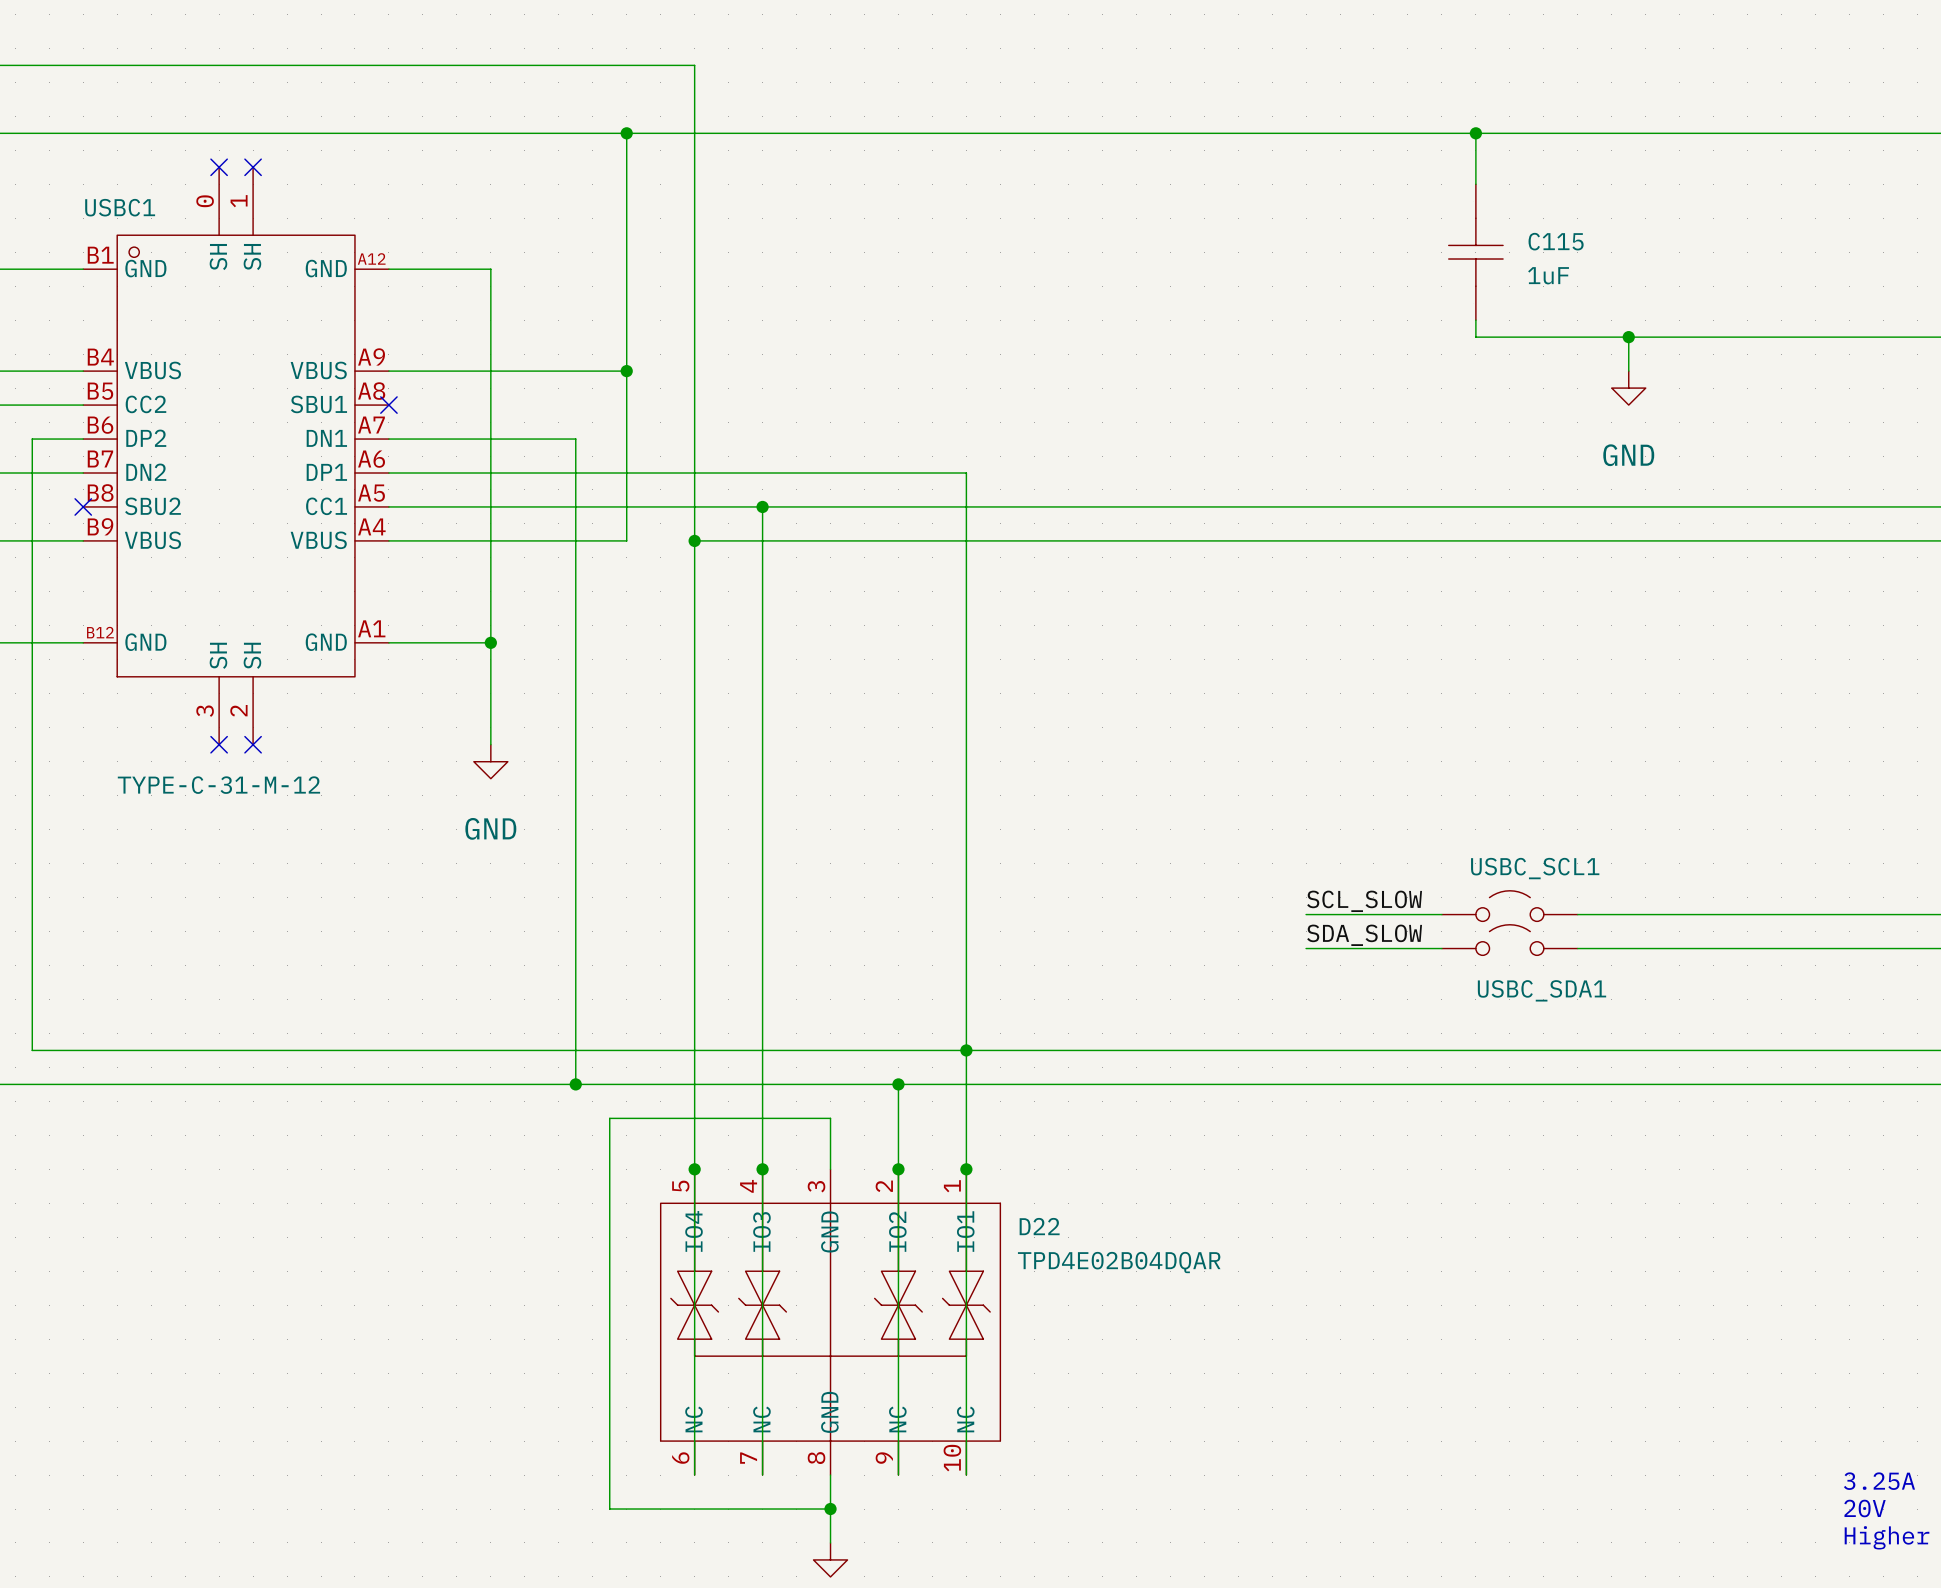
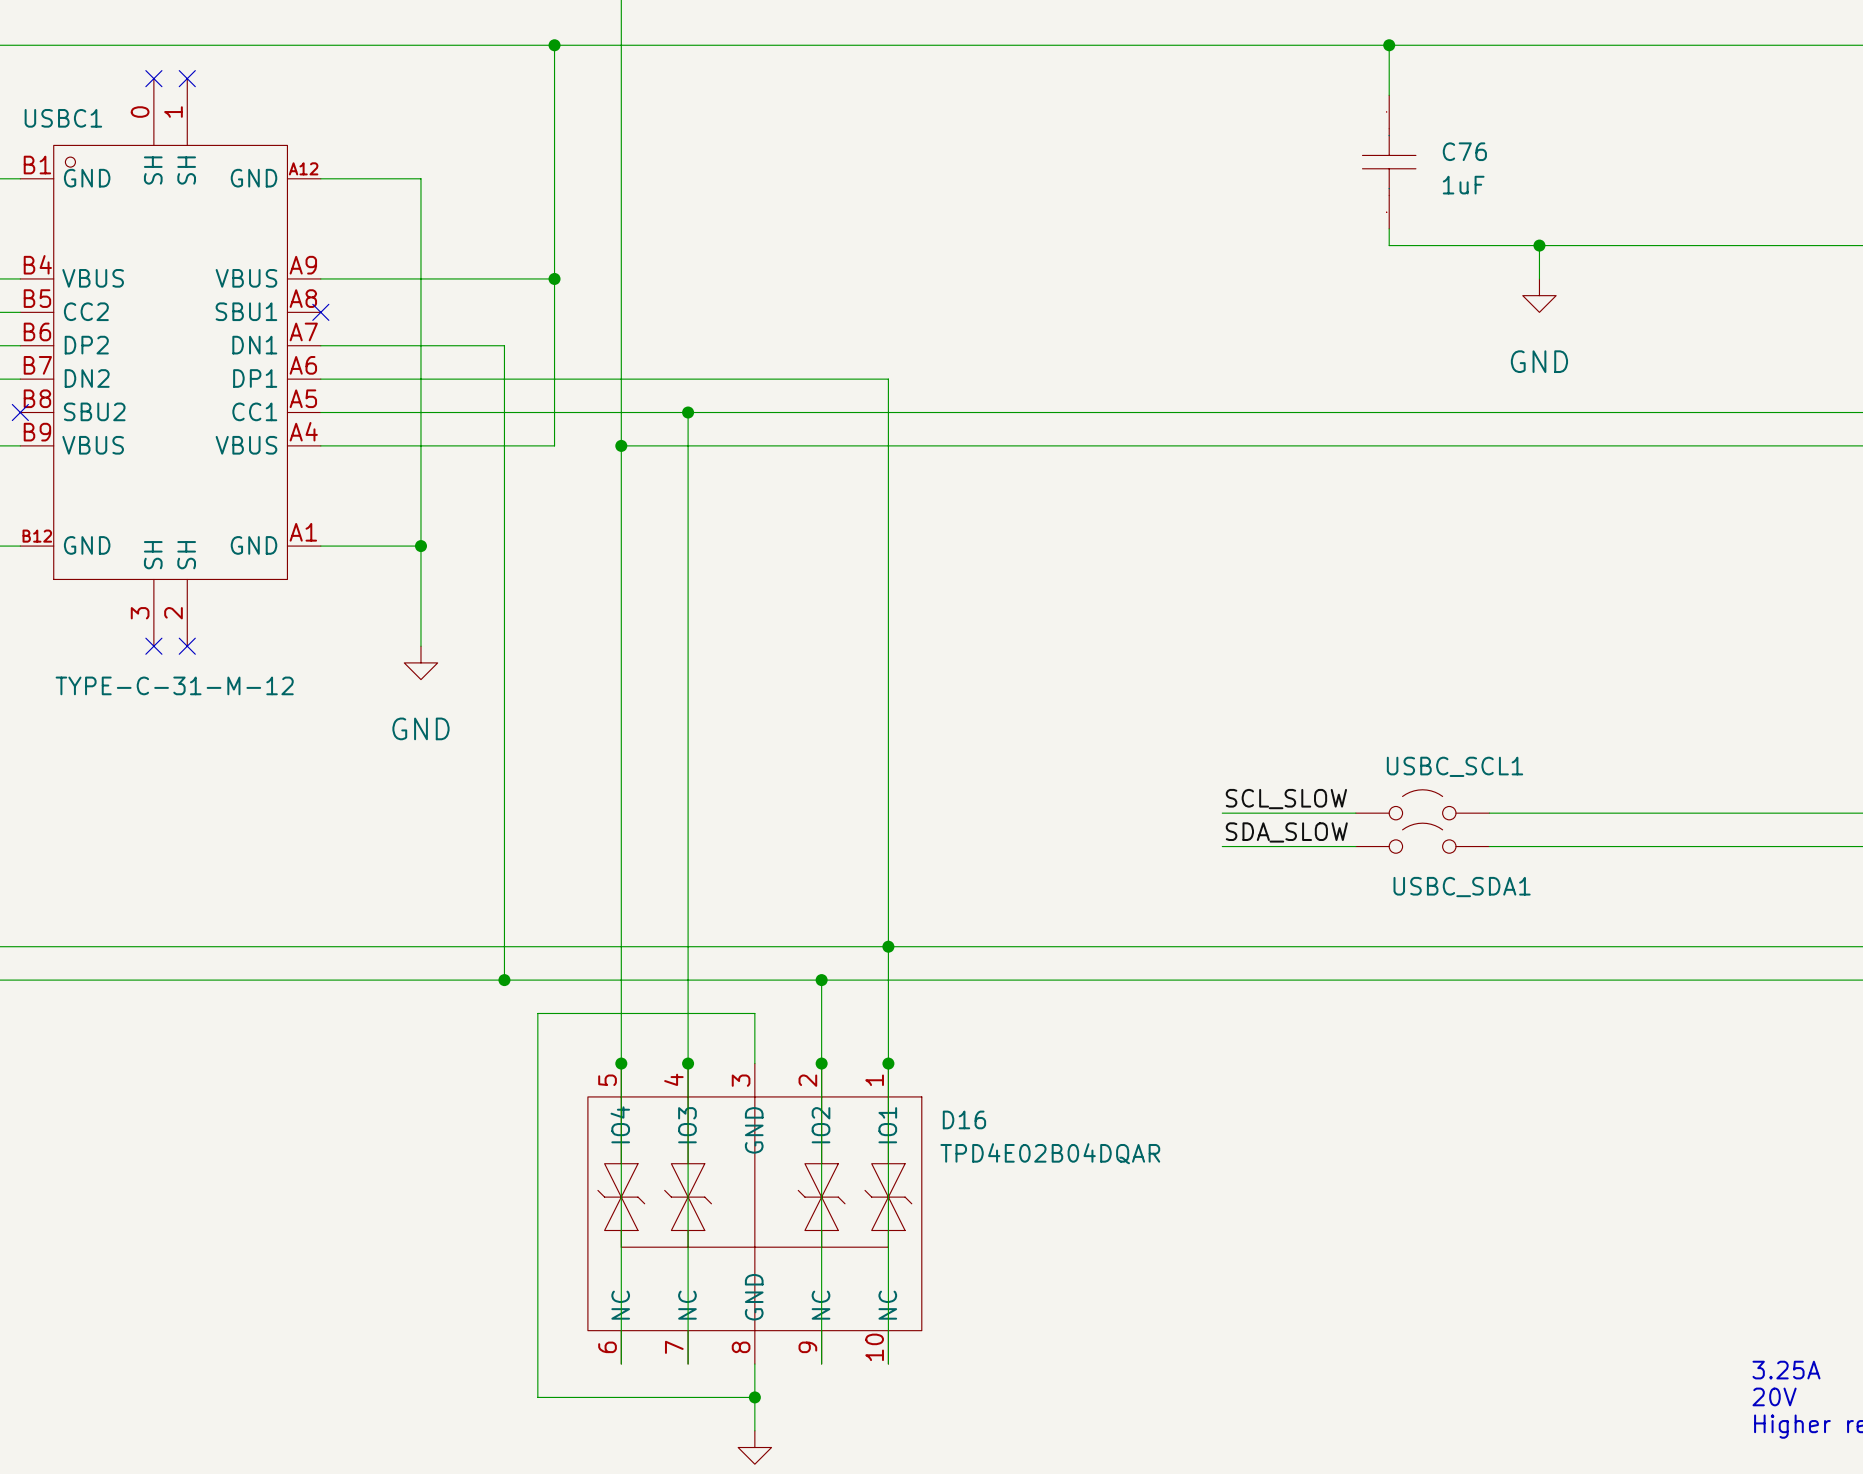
C115 name: C115 (1556, 241) -> C76 (1464, 151)
D22 name: D22 (1039, 1226) -> D16 (964, 1119)

